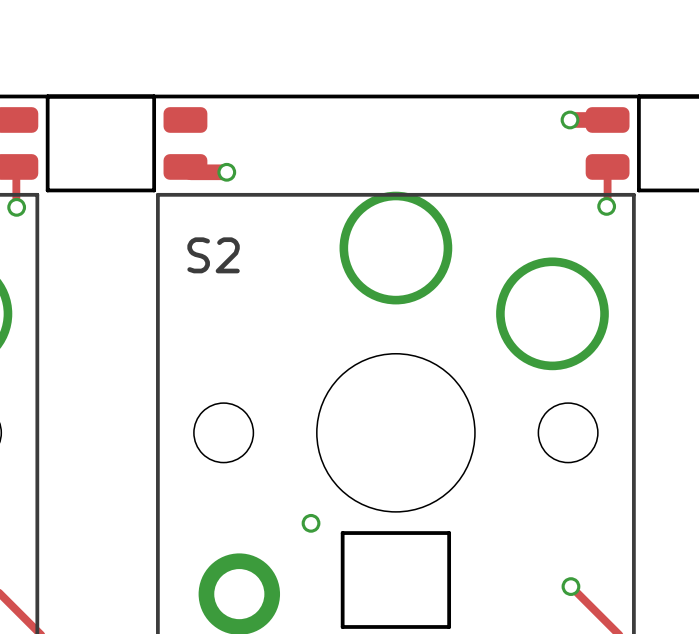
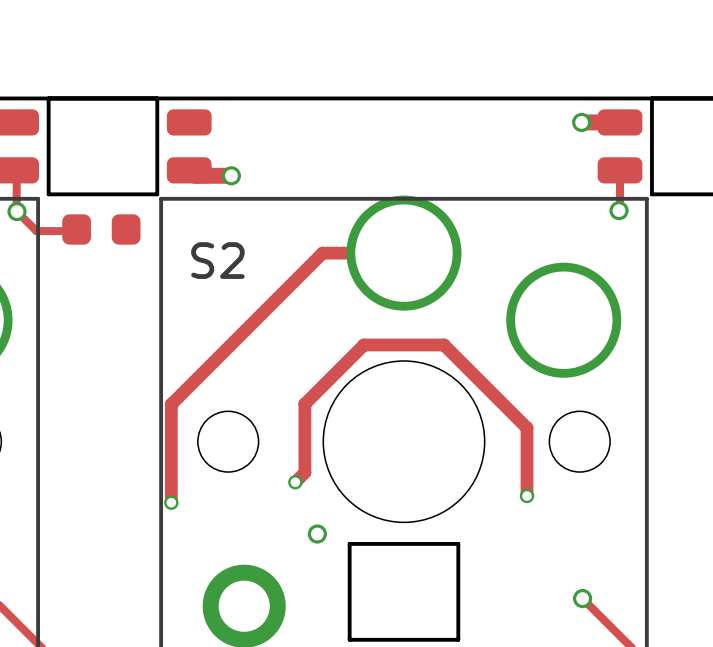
track: none -> (17, 211) (36, 231) (75, 231) (76, 229)
part: none -> (101, 229)
track: none -> (403, 253) (322, 253) (171, 404) (171, 502)
track: none -> (295, 482) (304, 472) (304, 404) (363, 345) (444, 345) (527, 427) (527, 496)
via: none -> (295, 482)
via: none -> (527, 496)
via: none -> (171, 502)

